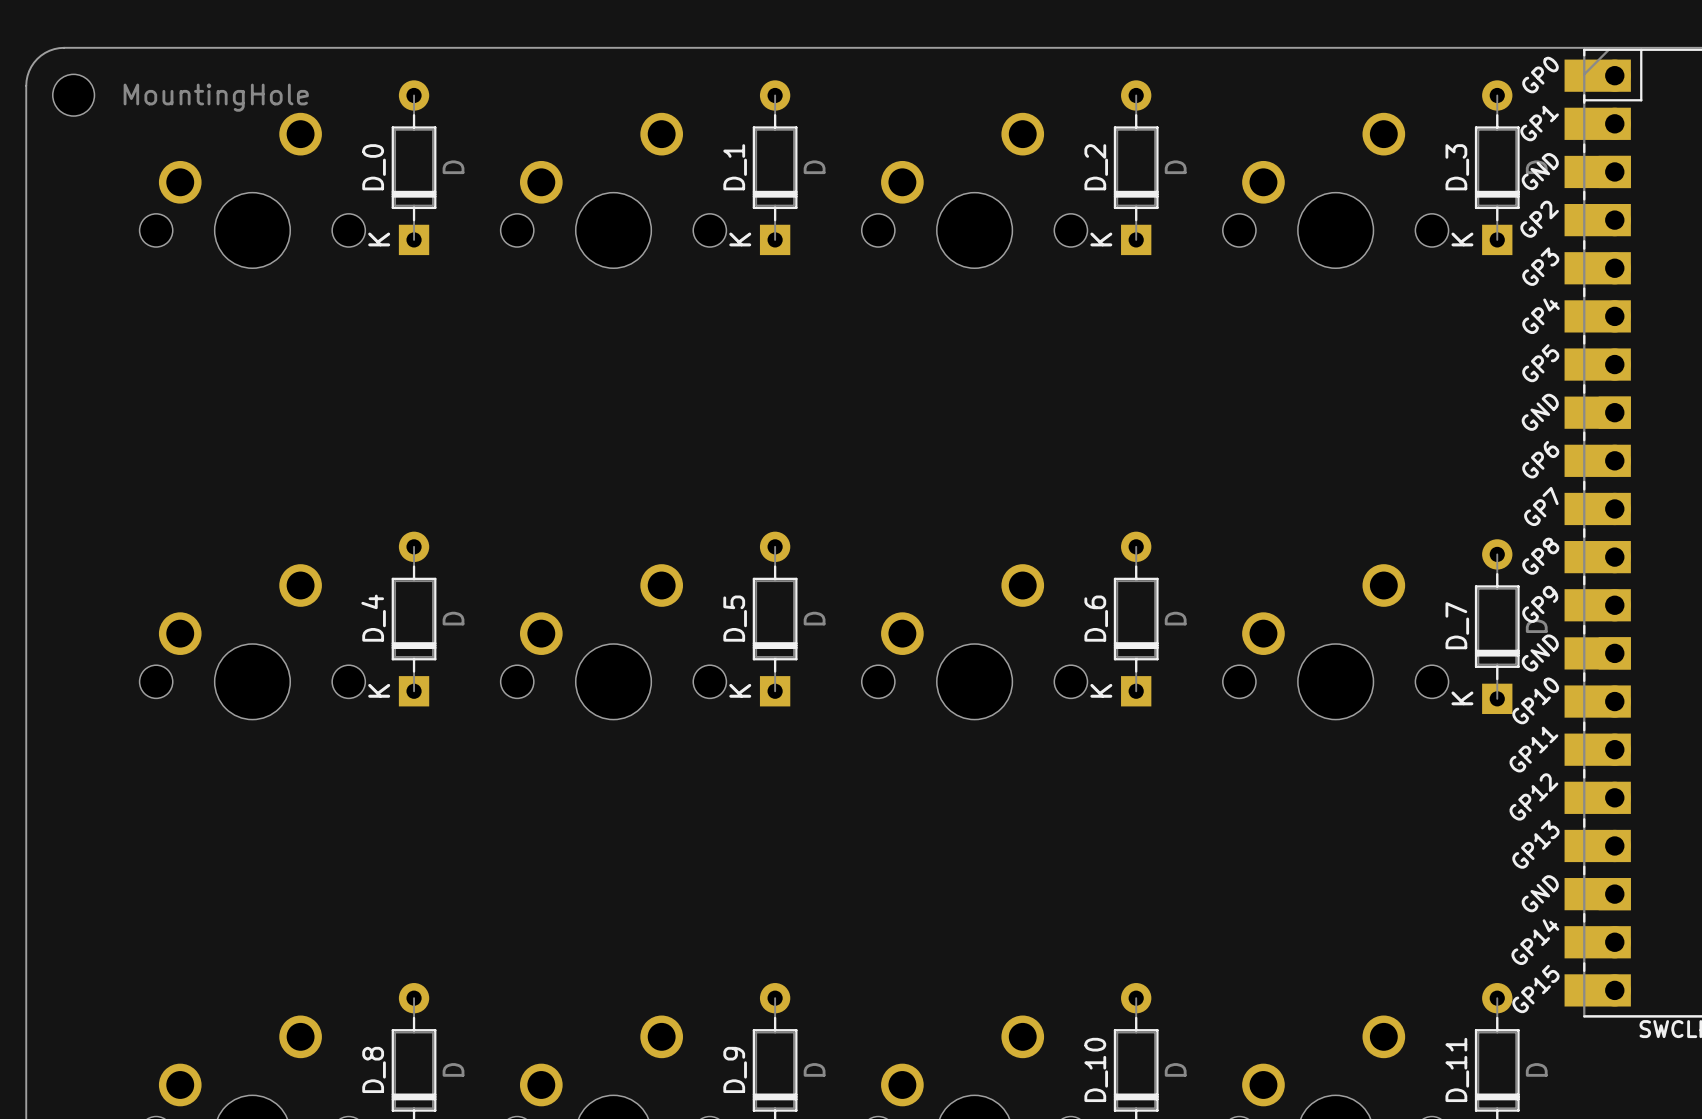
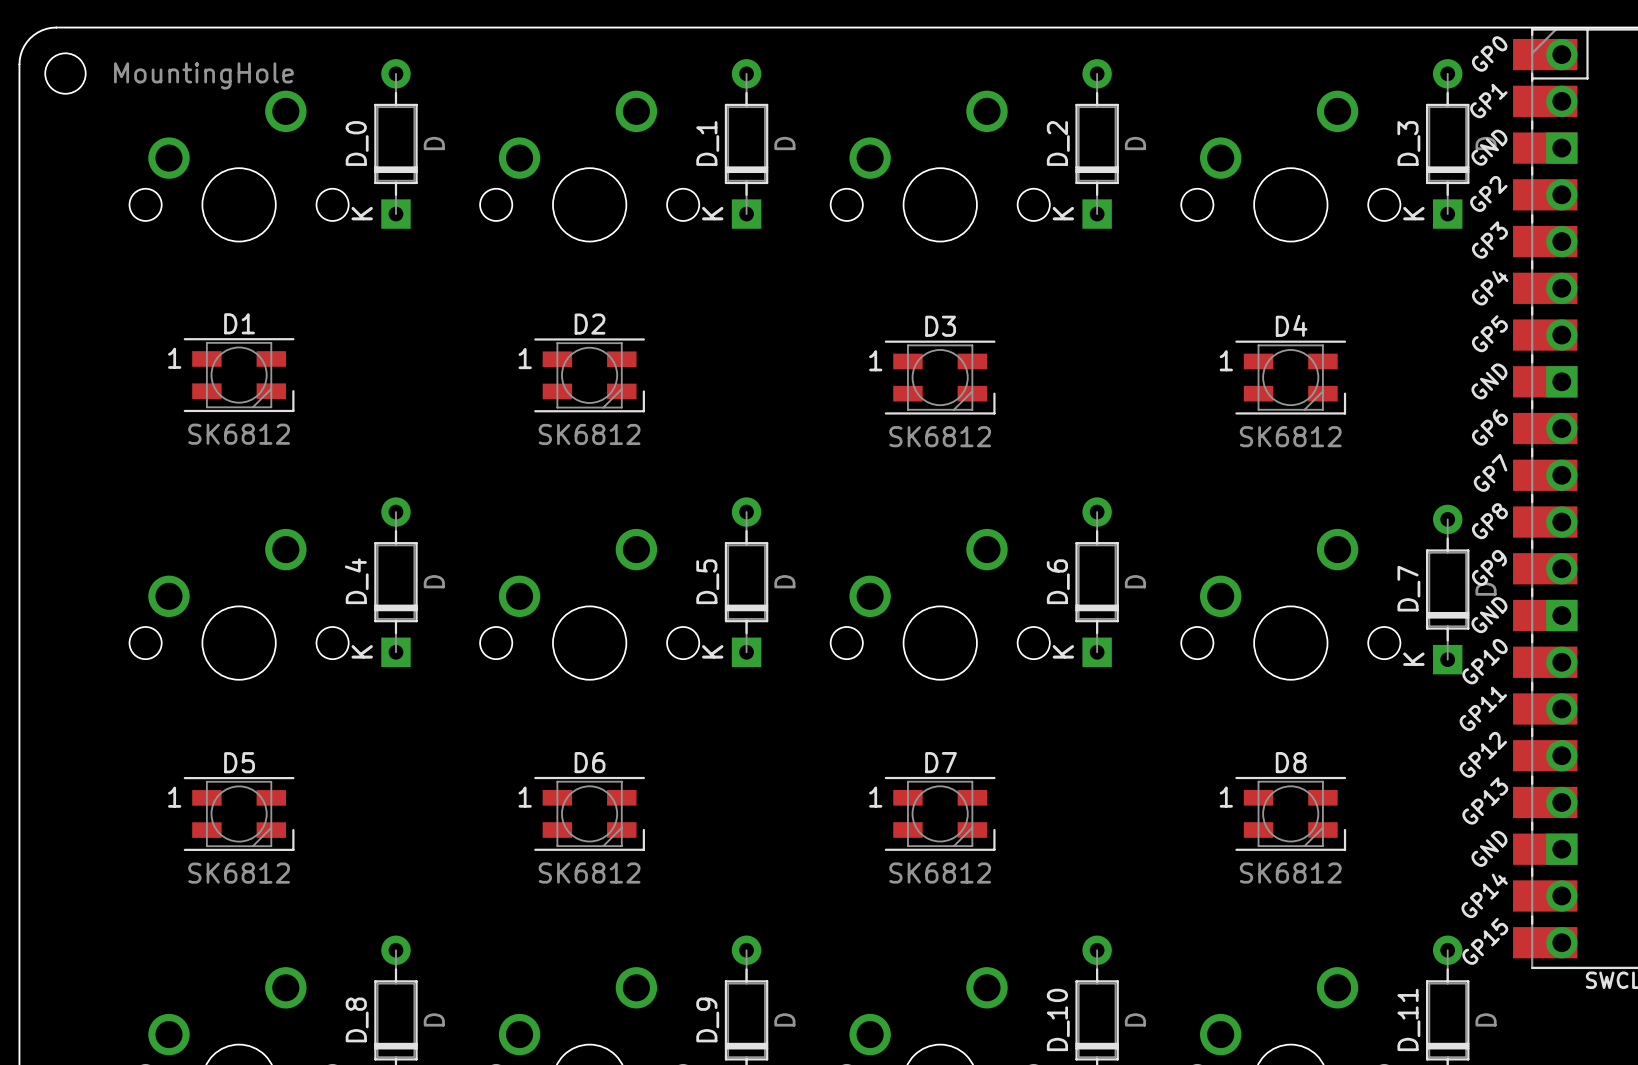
D1: none -> SK6812 (239, 375)
D2: none -> SK6812 (589, 375)
D3: none -> SK6812 (940, 377)
D4: none -> SK6812 (1290, 377)
D5: none -> SK6812 (239, 813)
D6: none -> SK6812 (589, 813)
D7: none -> SK6812 (940, 813)
D8: none -> SK6812 (1290, 813)

